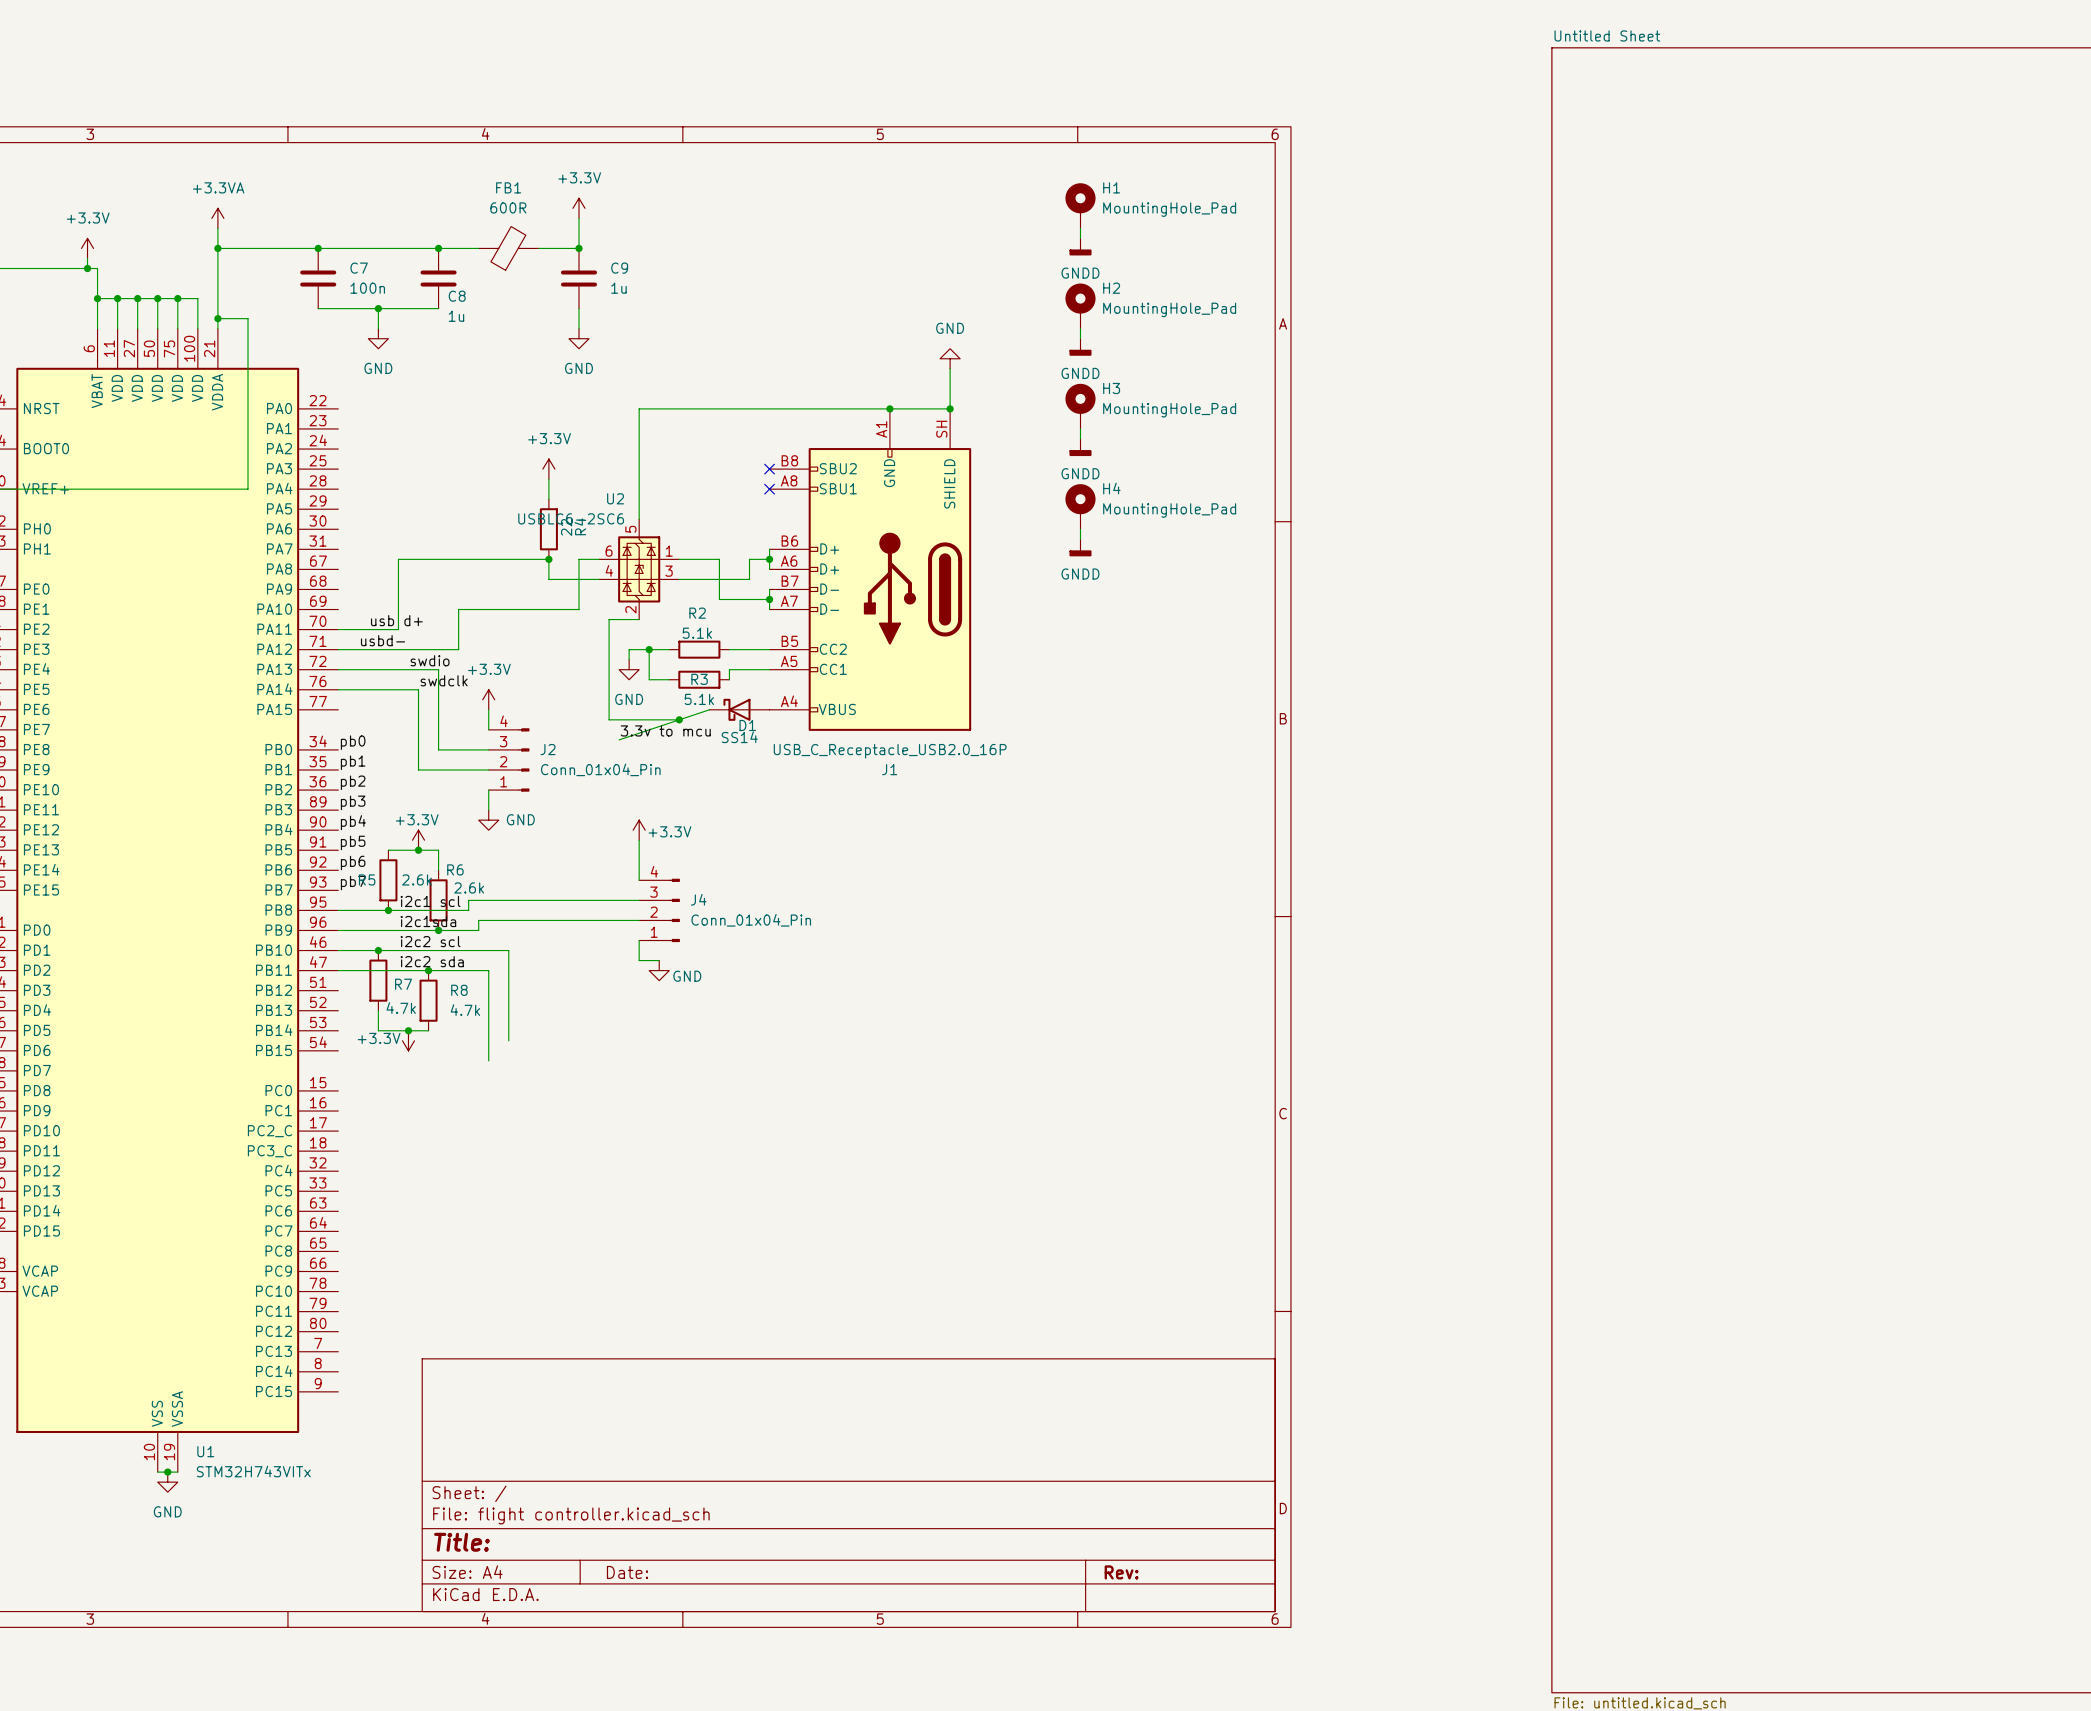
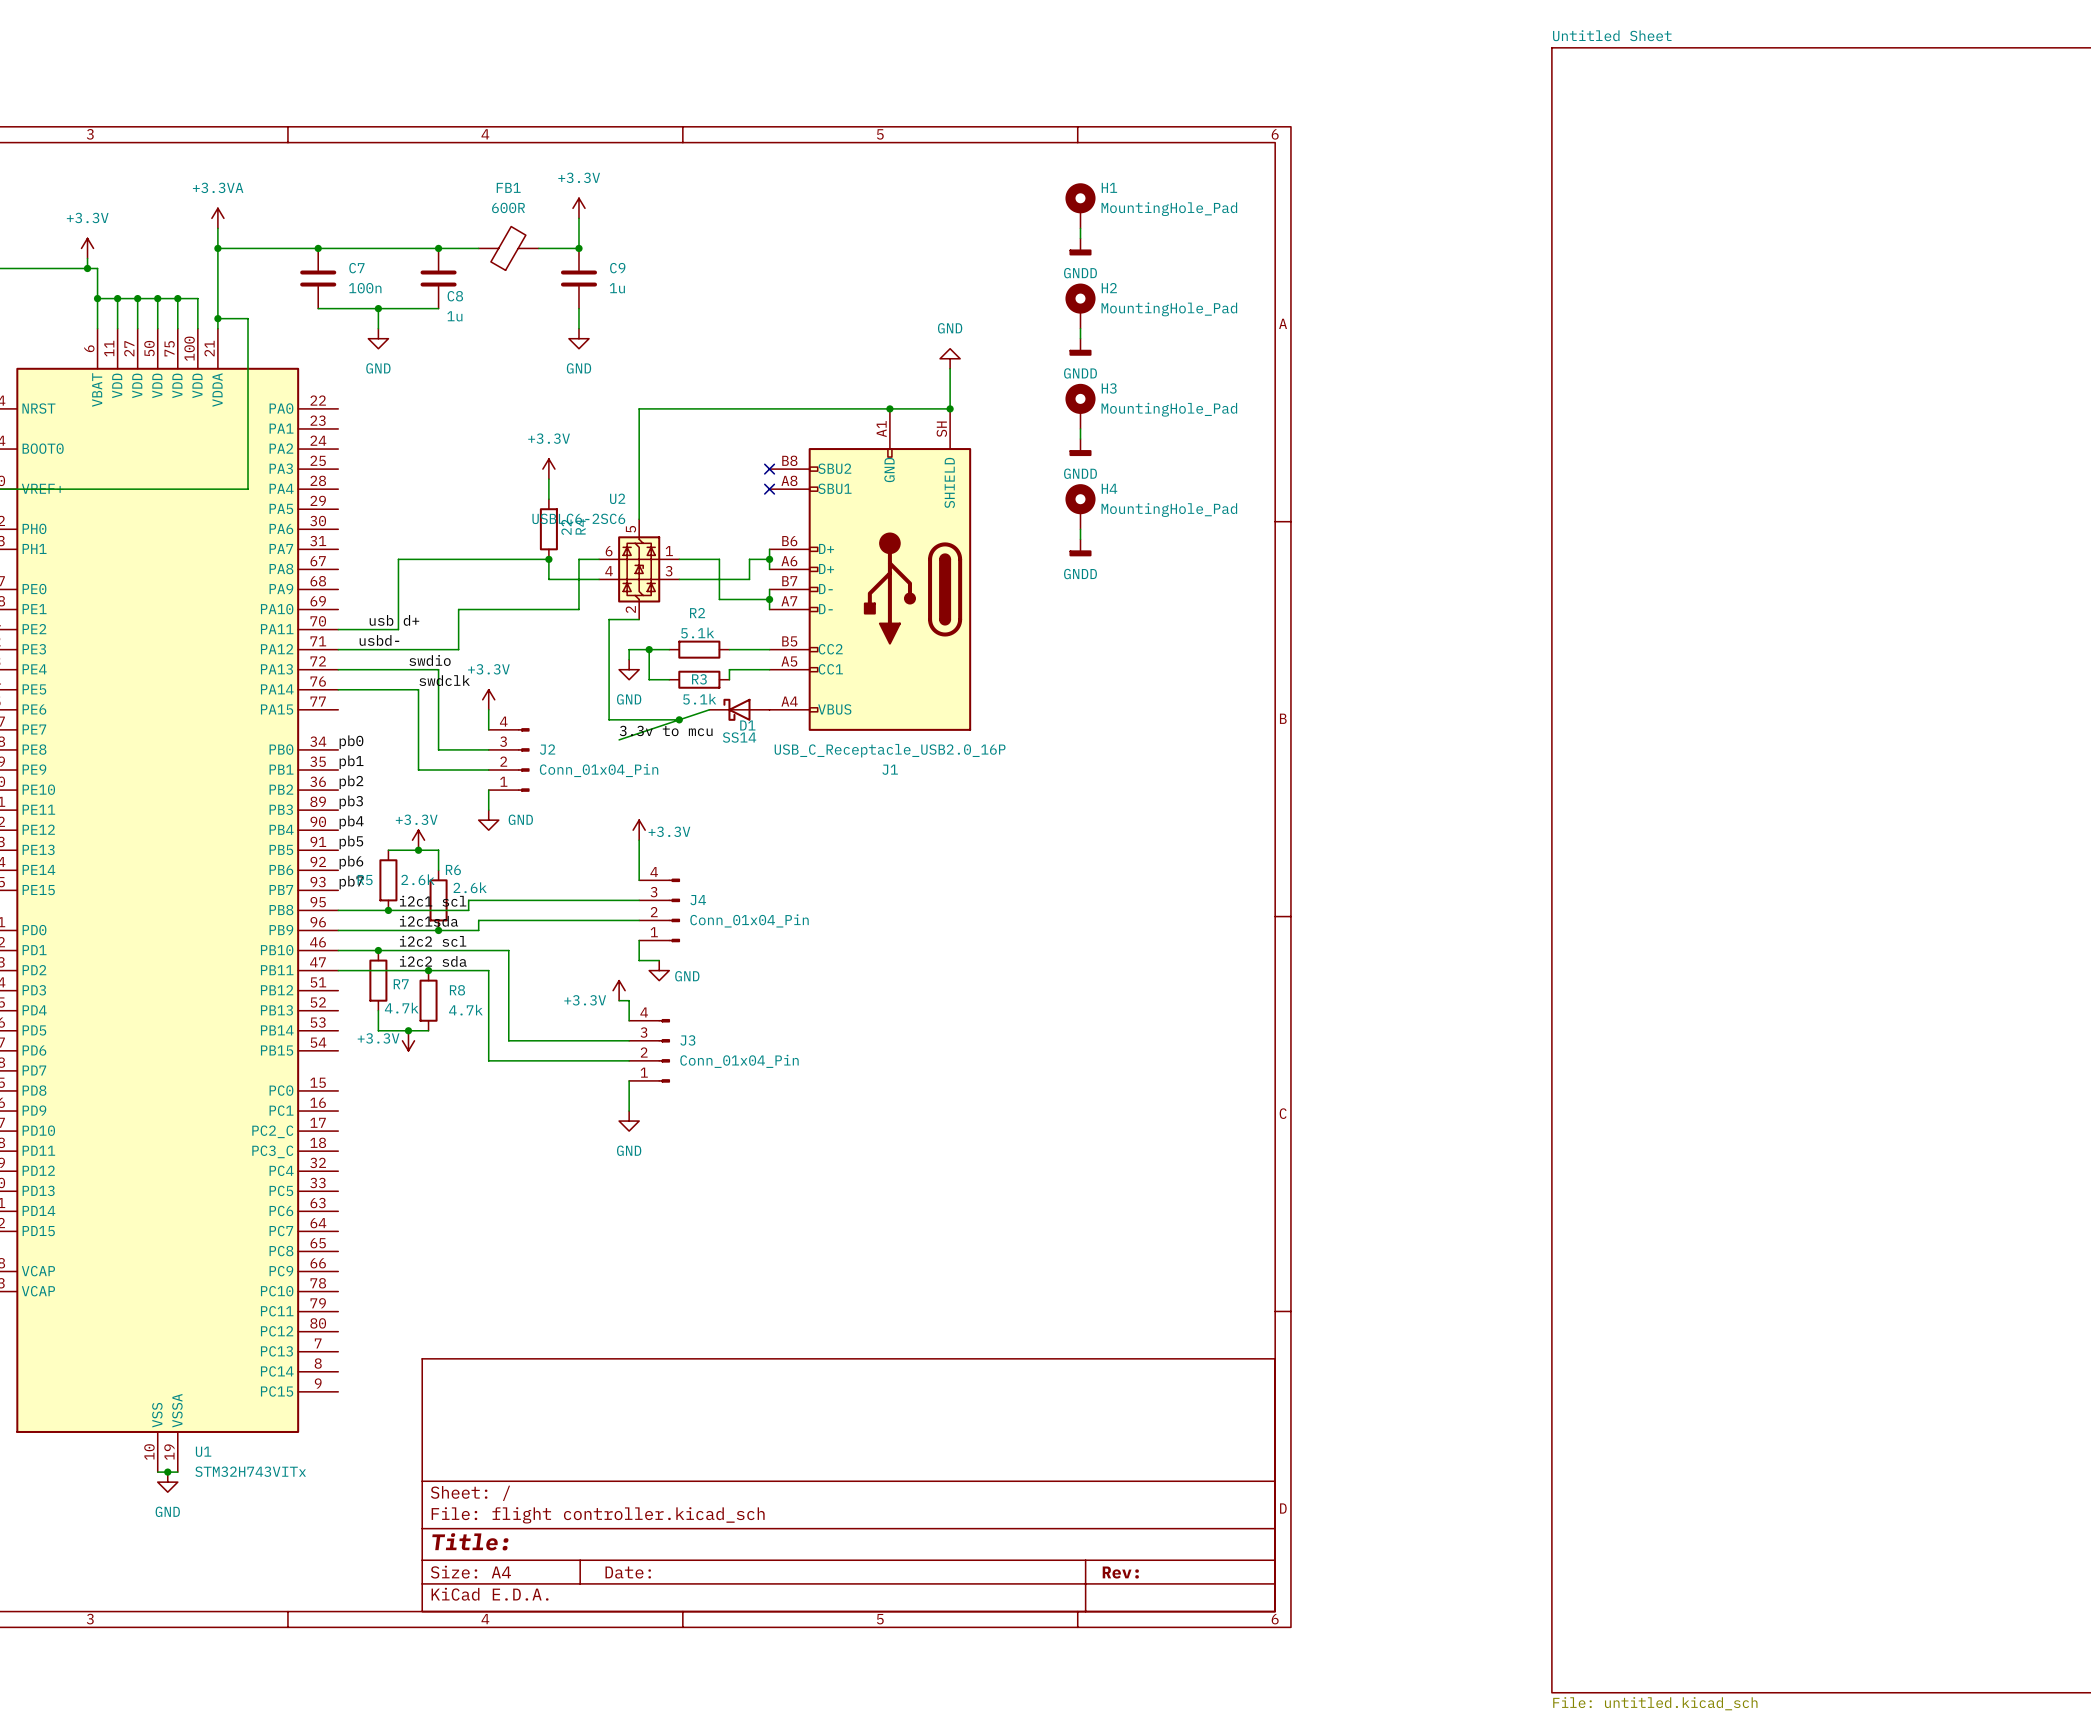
power symbol: none -> +3.3V (619, 990)
wire: none -> (619, 1000) (629, 1000) (629, 1020)
wire: none -> (508, 1040) (629, 1040)
J3: none -> Conn_01x04_Pin (649, 1050)
wire: none -> (488, 1060) (629, 1060)
wire: none -> (629, 1080) (629, 1111)
power symbol: none -> GND (629, 1121)

